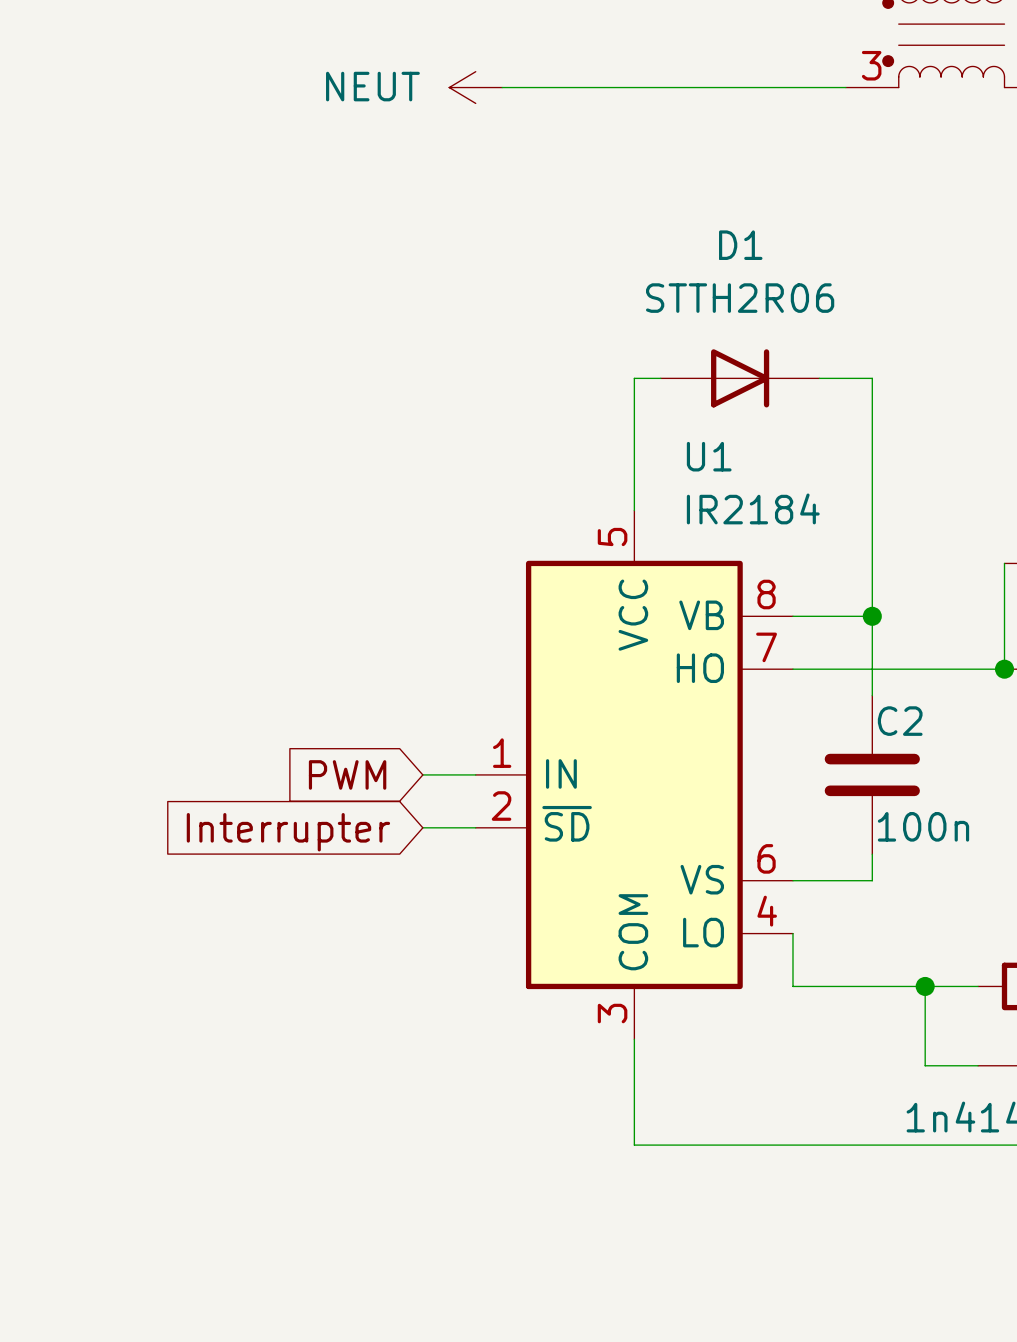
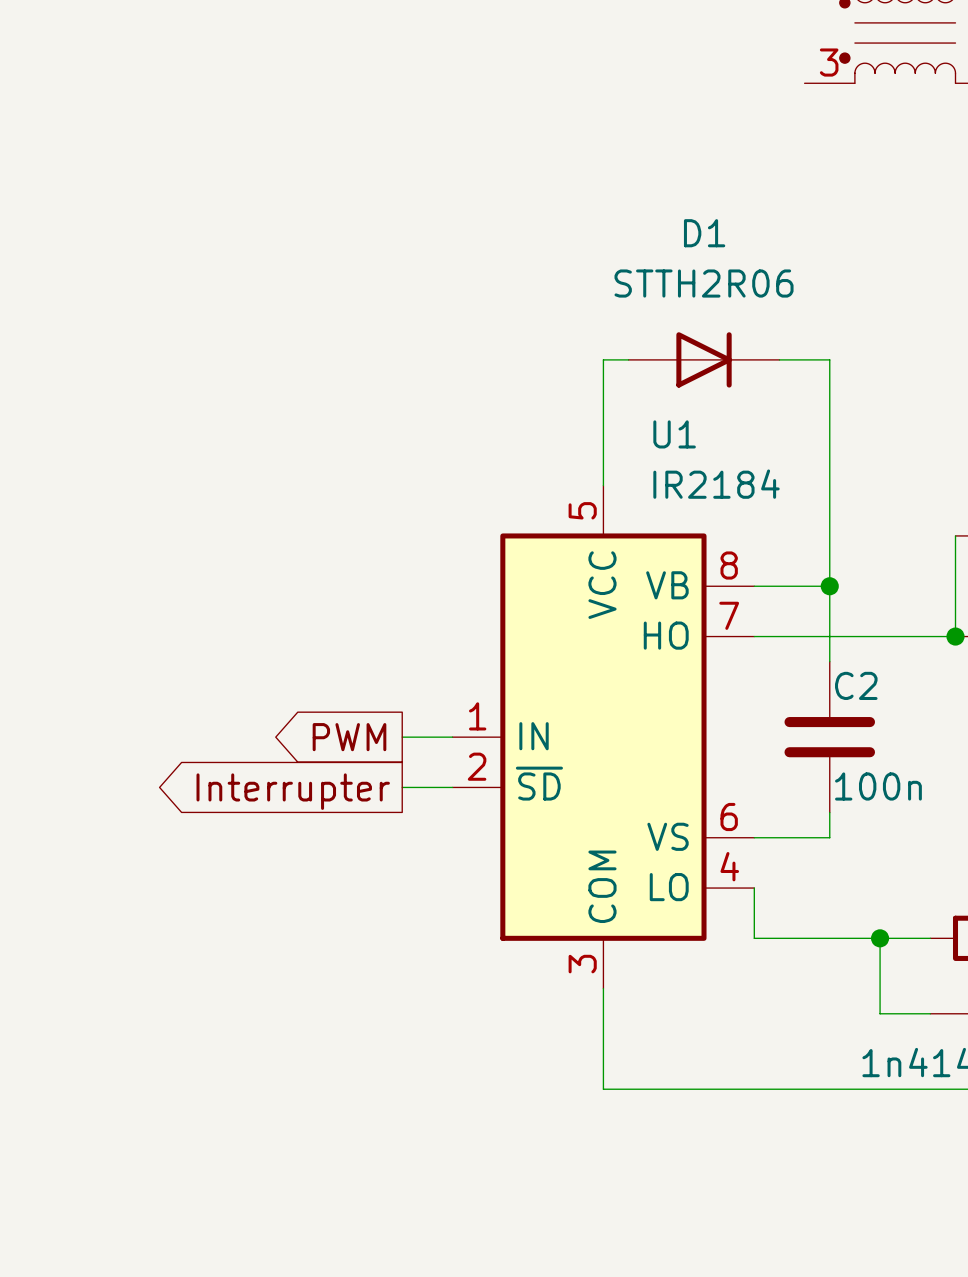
power symbol: NEUT (475, 87) -> none
wire: (502, 87) (845, 87) -> none
global label shape: input (347, 774) -> output (349, 737)
global label shape: input (288, 832) -> output (293, 791)

